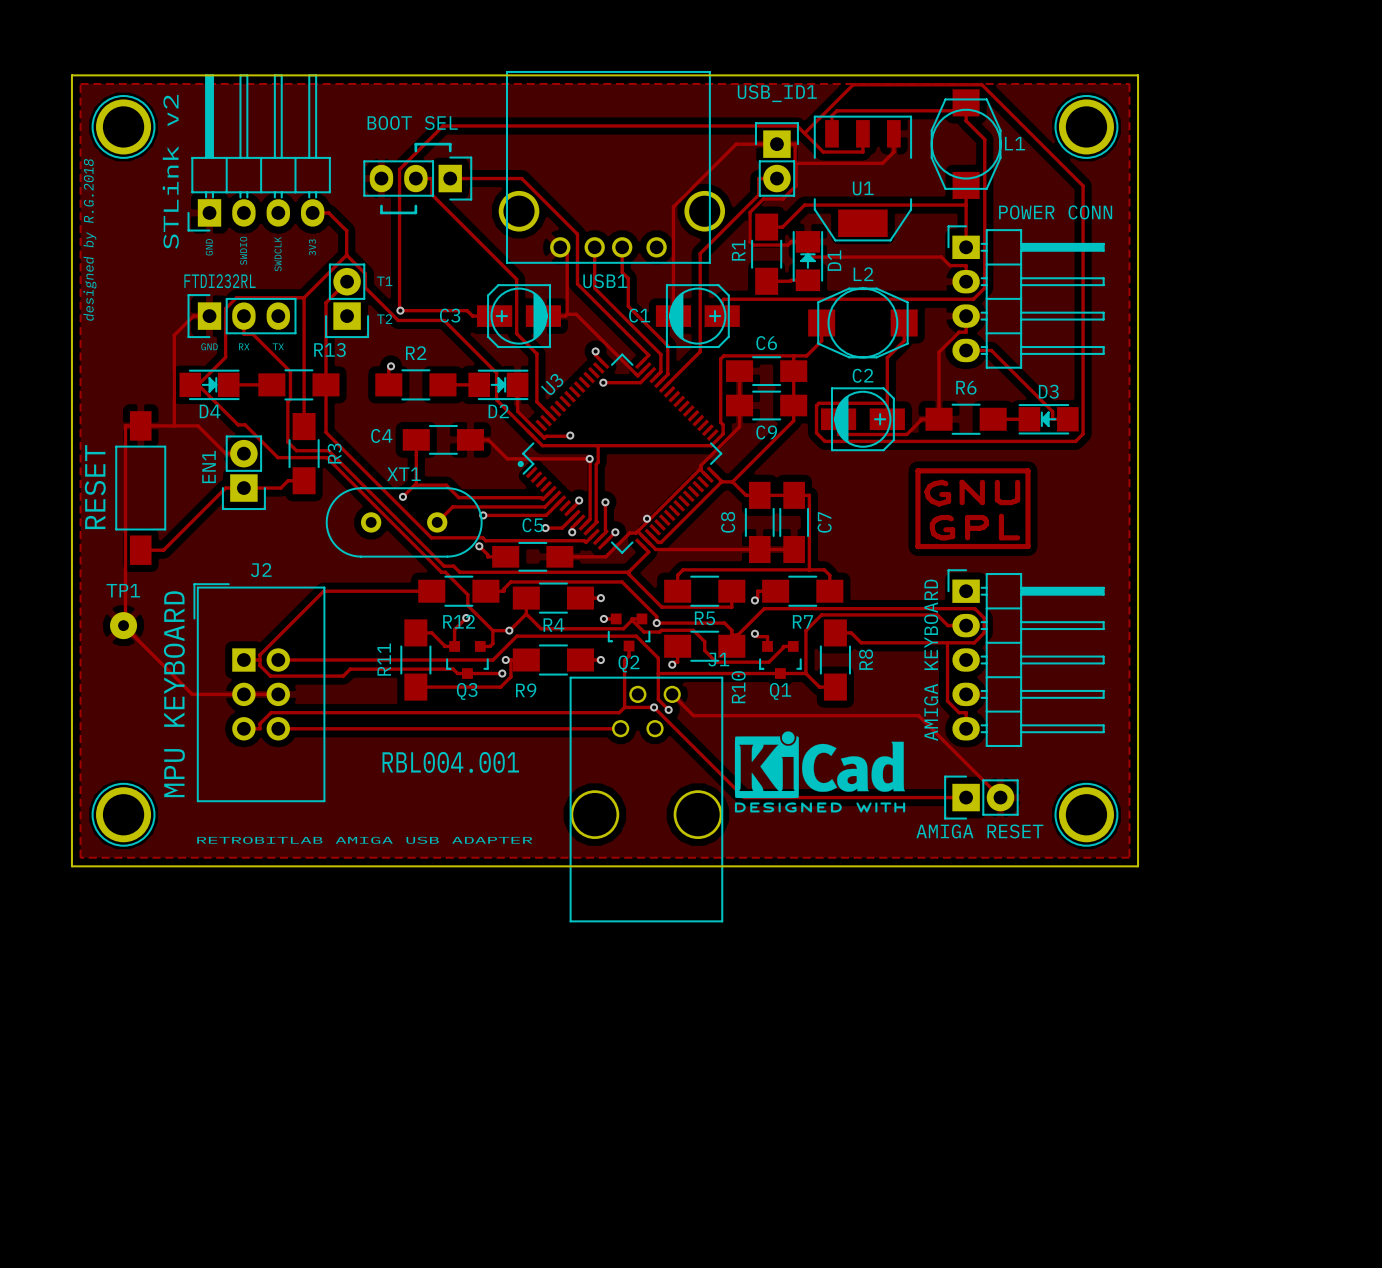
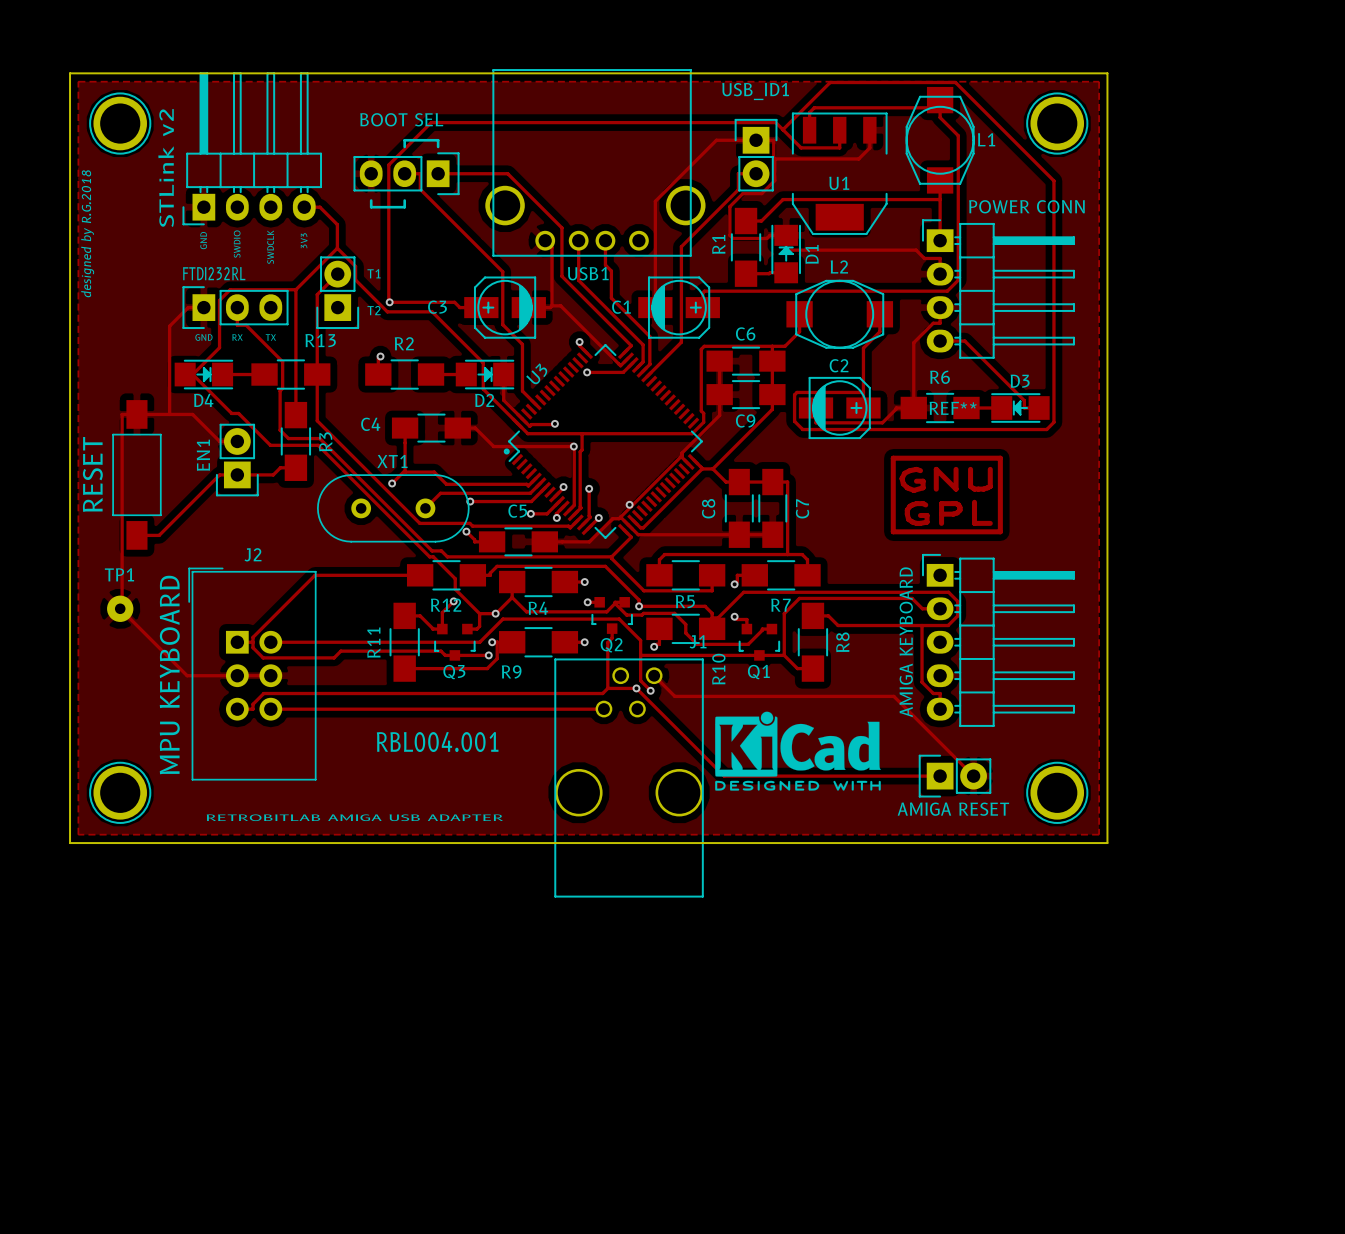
REF**: none -> (946, 495)

